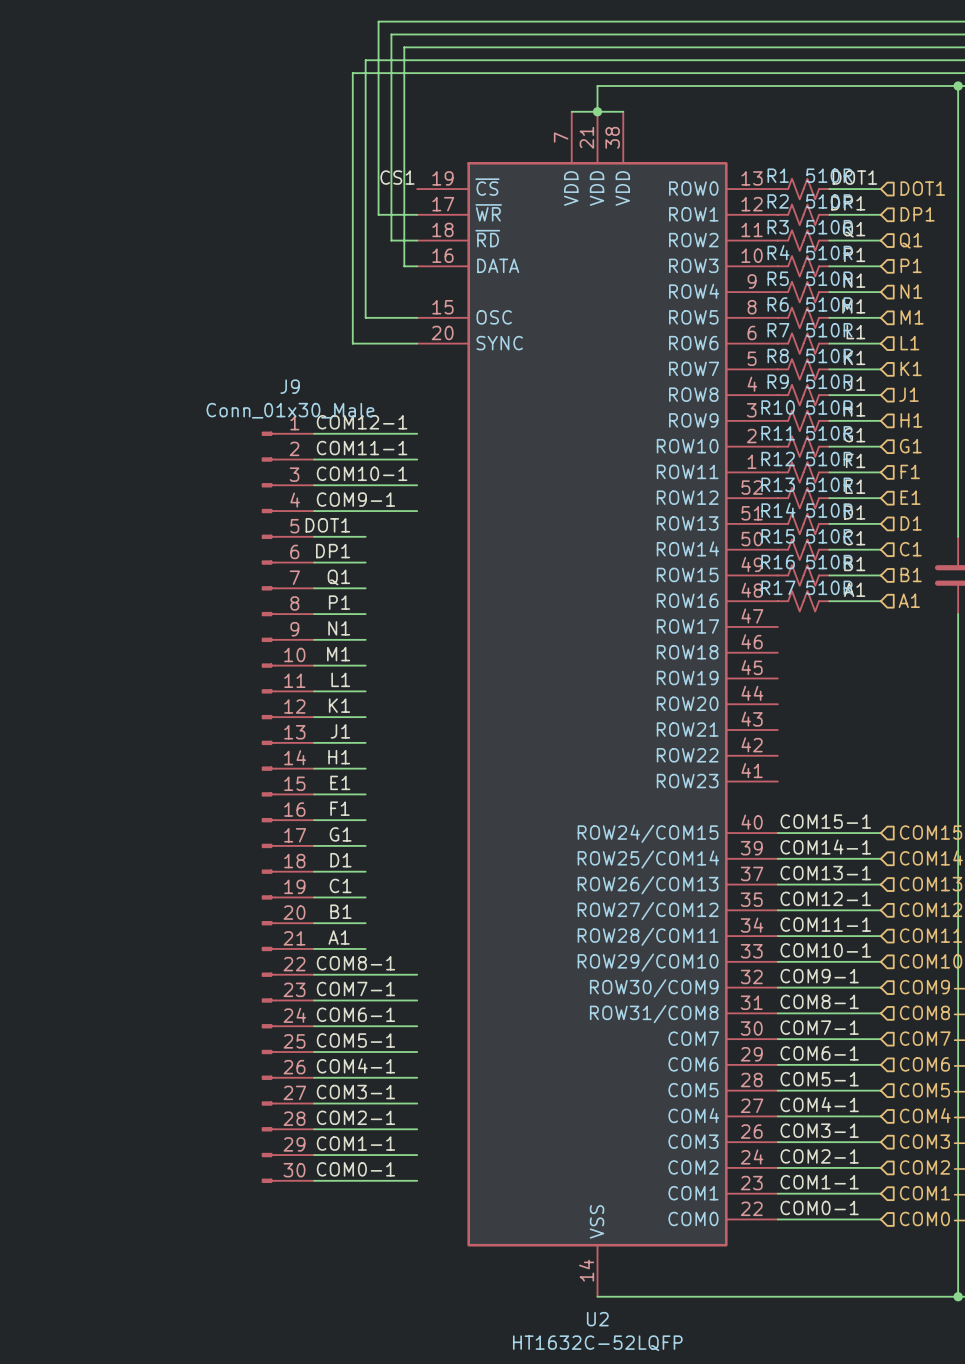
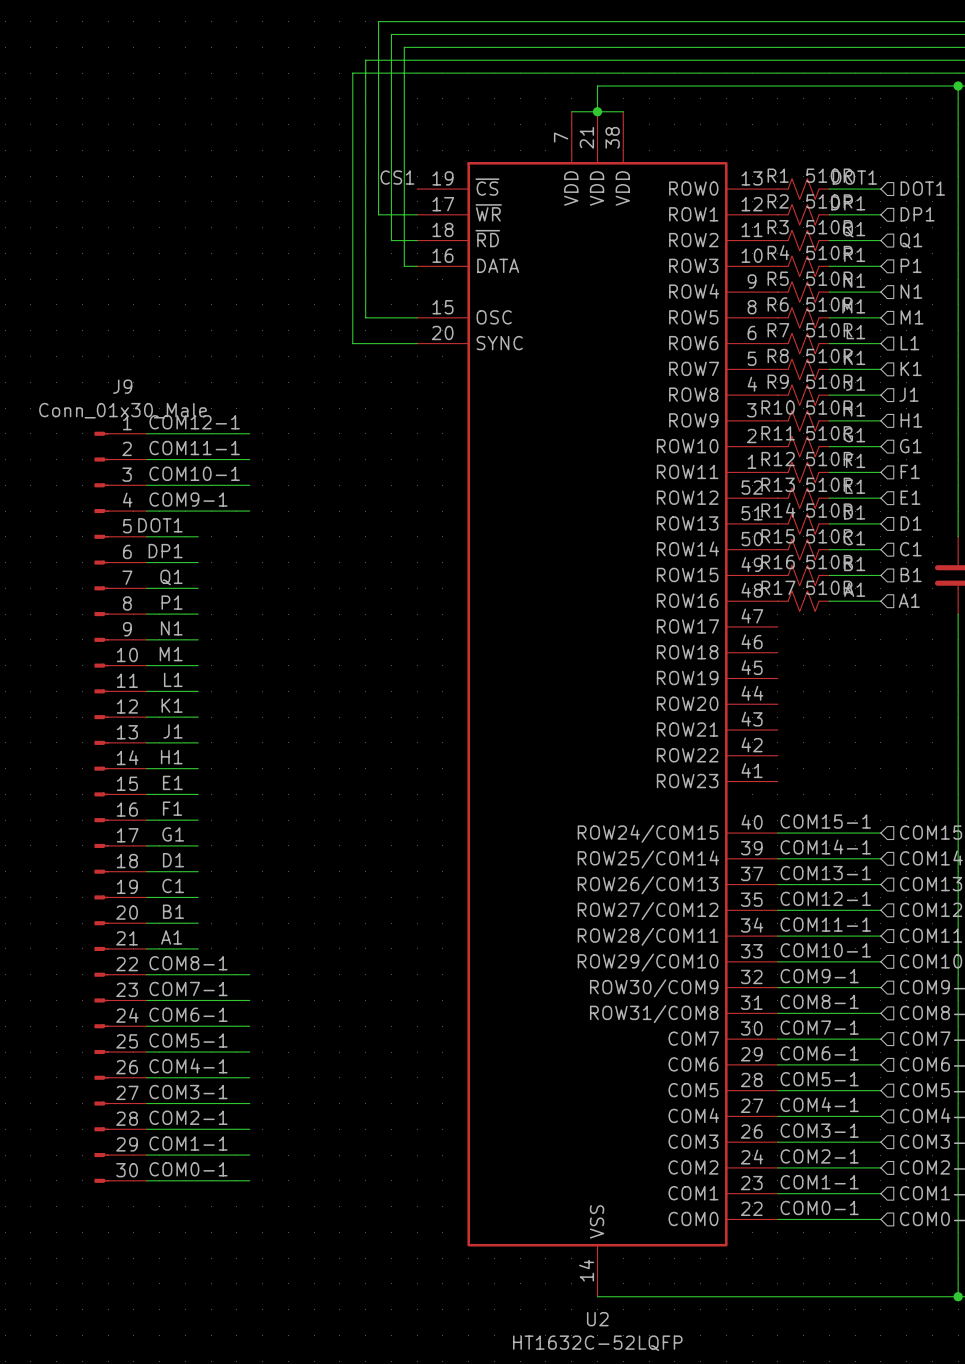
label position: COM12-1 (362, 422) -> COM12-1 (194, 422)
wire: (314, 433) (417, 433) -> (146, 433) (249, 433)
label position: COM11-1 (362, 448) -> COM11-1 (194, 448)
wire: (314, 459) (417, 459) -> (146, 459) (249, 459)
label position: COM10-1 (362, 473) -> COM10-1 (194, 473)
wire: (314, 485) (417, 485) -> (146, 485) (249, 485)
label position: COM9-1 (355, 499) -> COM9-1 (188, 499)
wire: (314, 511) (417, 511) -> (146, 511) (249, 511)
label position: DOT1 (327, 525) -> DOT1 (160, 525)
wire: (314, 536) (365, 536) -> (146, 536) (198, 536)
label position: DP1 (333, 551) -> DP1 (165, 551)
wire: (314, 562) (365, 562) -> (146, 562) (198, 562)
label position: Q1 (338, 577) -> Q1 (171, 577)
wire: (314, 588) (365, 588) -> (146, 588) (198, 588)
label position: P1 (339, 602) -> P1 (172, 602)
wire: (314, 614) (365, 614) -> (146, 614) (198, 614)
label position: N1 (339, 628) -> N1 (171, 628)
wire: (314, 639) (365, 639) -> (146, 639) (198, 639)
label position: M1 (338, 654) -> M1 (171, 654)
wire: (314, 665) (365, 665) -> (146, 665) (198, 665)
label position: L1 (340, 679) -> L1 (173, 679)
wire: (314, 691) (365, 691) -> (146, 691) (198, 691)
label position: K1 (339, 705) -> K1 (172, 705)
wire: (314, 717) (365, 717) -> (146, 717) (198, 717)
label position: J1 (340, 731) -> J1 (172, 731)
wire: (314, 742) (365, 742) -> (146, 742) (198, 742)
label position: H1 (339, 757) -> H1 (171, 757)
wire: (314, 768) (365, 768) -> (146, 768) (198, 768)
label position: E1 (340, 782) -> E1 (172, 782)
wire: (314, 794) (365, 794) -> (146, 794) (198, 794)
J9 position: (288, 807) -> (120, 807)
label position: F1 (340, 808) -> F1 (172, 808)
wire: (314, 820) (365, 820) -> (146, 820) (198, 820)
label position: G1 (340, 834) -> G1 (173, 834)
wire: (314, 845) (365, 845) -> (146, 845) (198, 845)
label position: D1 (340, 860) -> D1 (173, 860)
wire: (314, 871) (365, 871) -> (146, 871) (198, 871)
label position: C1 (340, 885) -> C1 (173, 885)
wire: (314, 897) (365, 897) -> (146, 897) (198, 897)
label position: B1 (340, 911) -> B1 (173, 911)
wire: (314, 923) (365, 923) -> (146, 923) (198, 923)
label position: A1 (339, 937) -> A1 (171, 937)
wire: (314, 948) (365, 948) -> (146, 948) (198, 948)
label position: COM8-1 (355, 963) -> COM8-1 (188, 963)
wire: (314, 974) (417, 974) -> (146, 974) (249, 974)
label position: COM7-1 (355, 988) -> COM7-1 (188, 988)
wire: (314, 1000) (417, 1000) -> (146, 1000) (249, 1000)
label position: COM6-1 (355, 1014) -> COM6-1 (188, 1014)
wire: (314, 1026) (417, 1026) -> (146, 1026) (249, 1026)
label position: COM5-1 (355, 1040) -> COM5-1 (188, 1040)
wire: (314, 1052) (417, 1052) -> (146, 1052) (249, 1052)
label position: COM4-1 (355, 1065) -> COM4-1 (188, 1065)
wire: (314, 1077) (417, 1077) -> (146, 1077) (249, 1077)
label position: COM3-1 (355, 1092) -> COM3-1 (188, 1092)
wire: (314, 1103) (417, 1103) -> (146, 1103) (249, 1103)
label position: COM2-1 (355, 1117) -> COM2-1 (188, 1117)
wire: (314, 1129) (417, 1129) -> (146, 1129) (249, 1129)
label position: COM1-1 (355, 1143) -> COM1-1 (188, 1143)
wire: (314, 1155) (417, 1155) -> (146, 1155) (249, 1155)
label position: COM0-1 (355, 1169) -> COM0-1 (188, 1169)
wire: (314, 1180) (417, 1180) -> (146, 1180) (249, 1180)

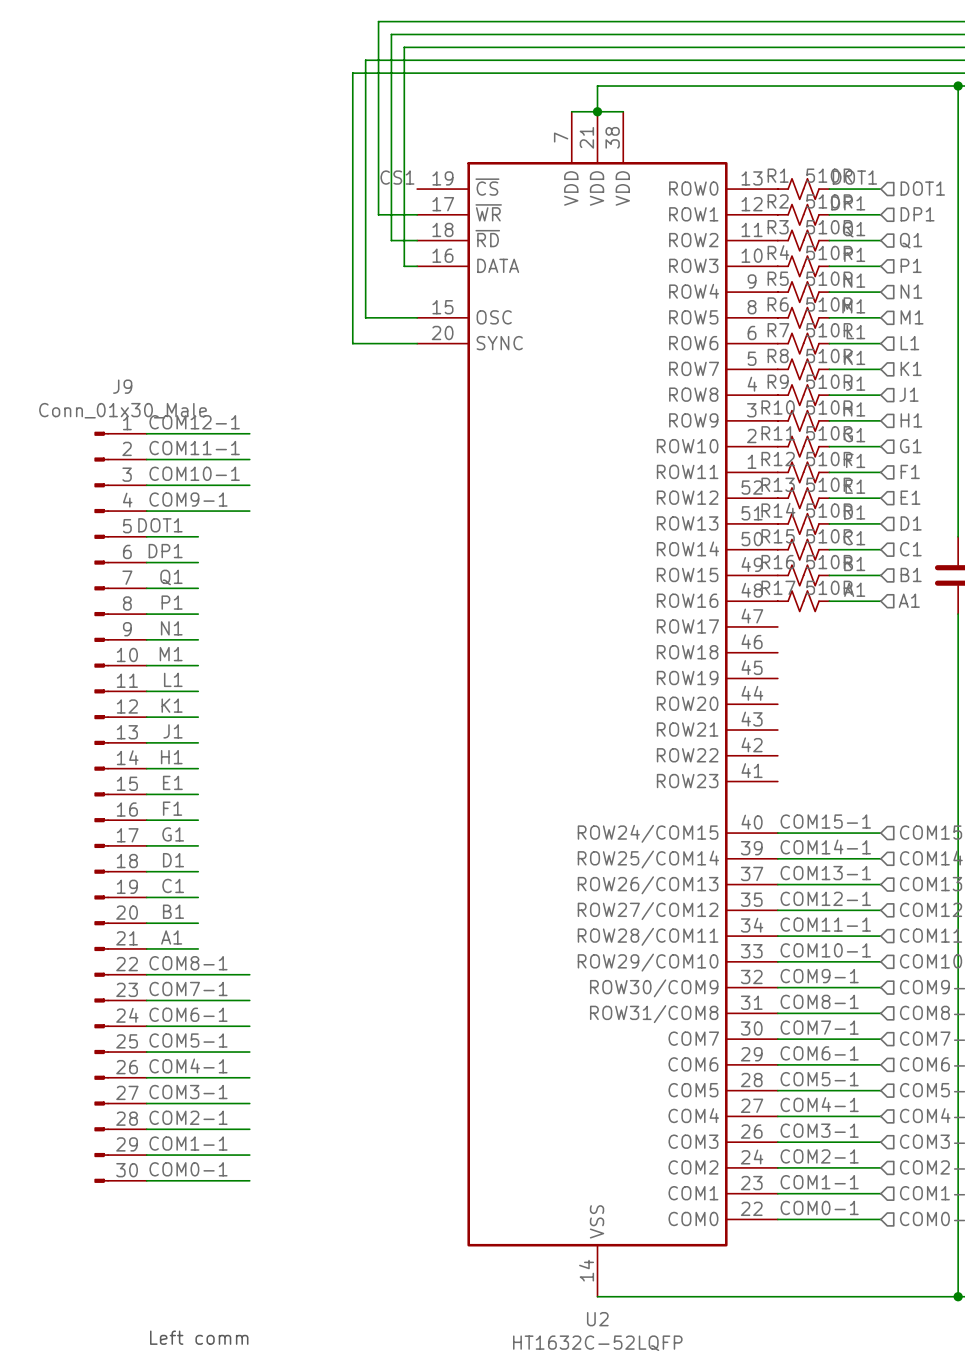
text: none -> Left comm (199, 1337)

